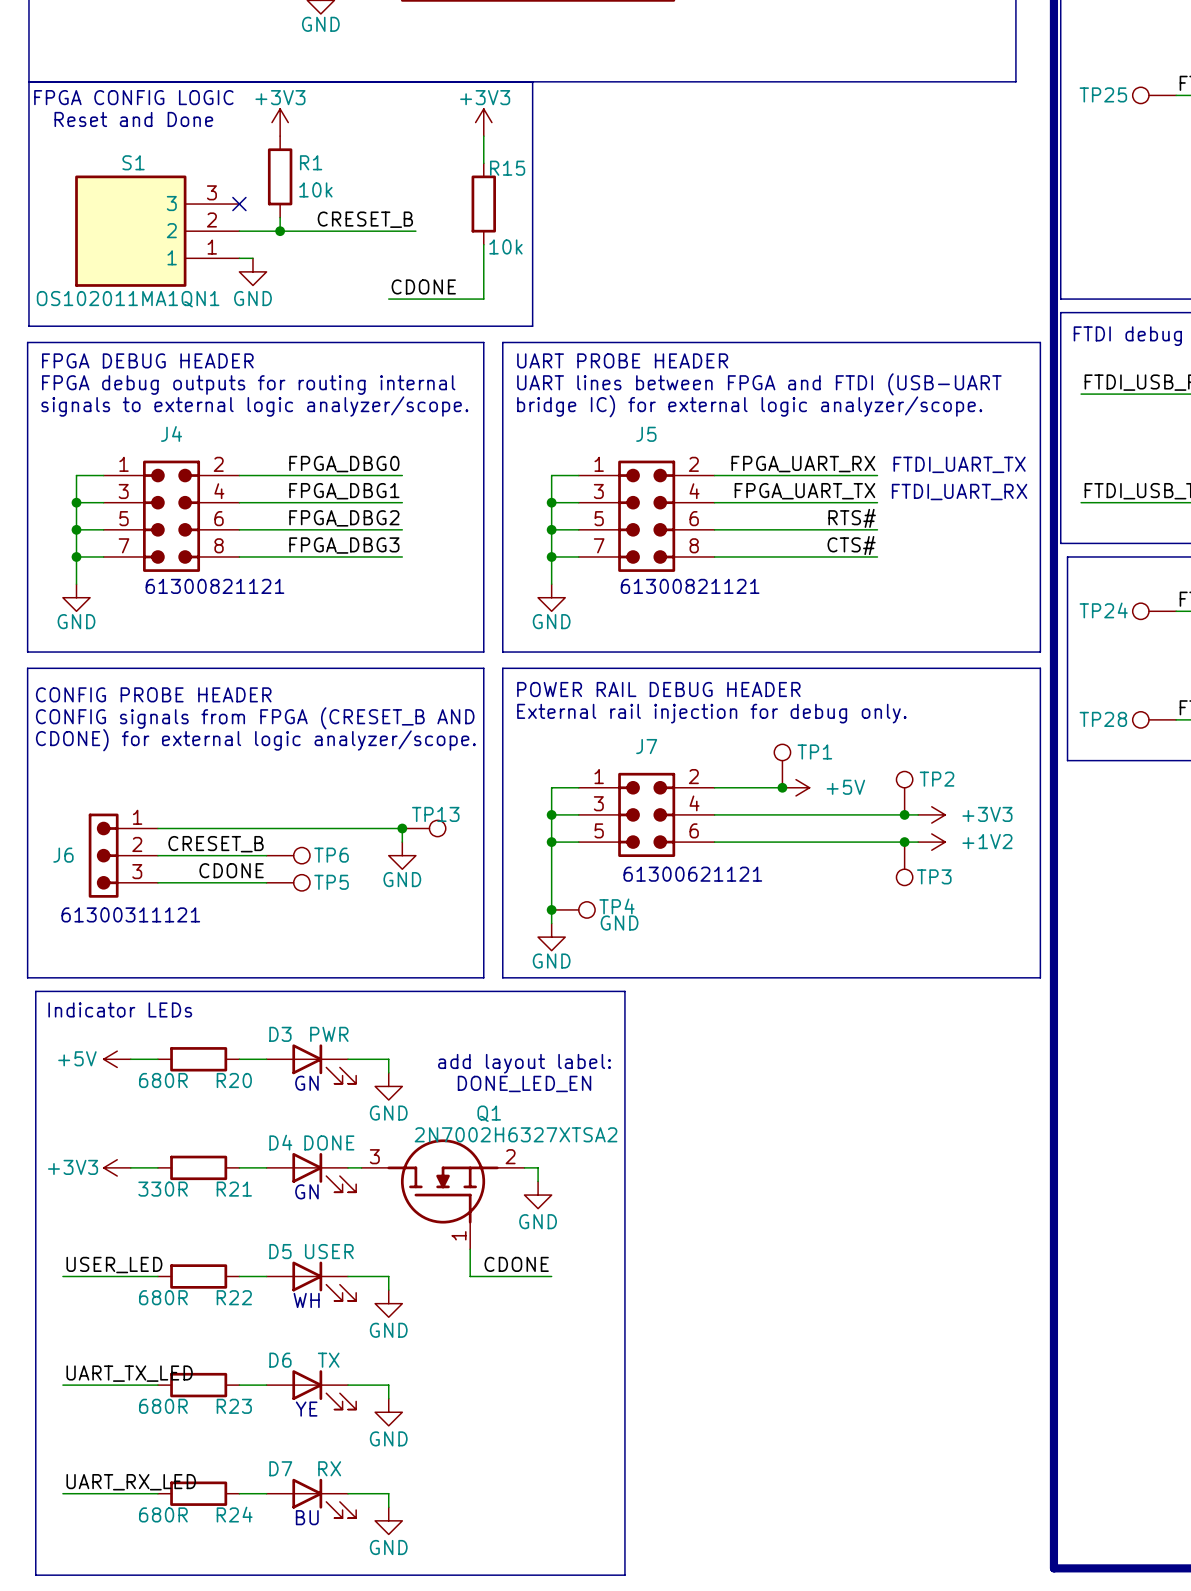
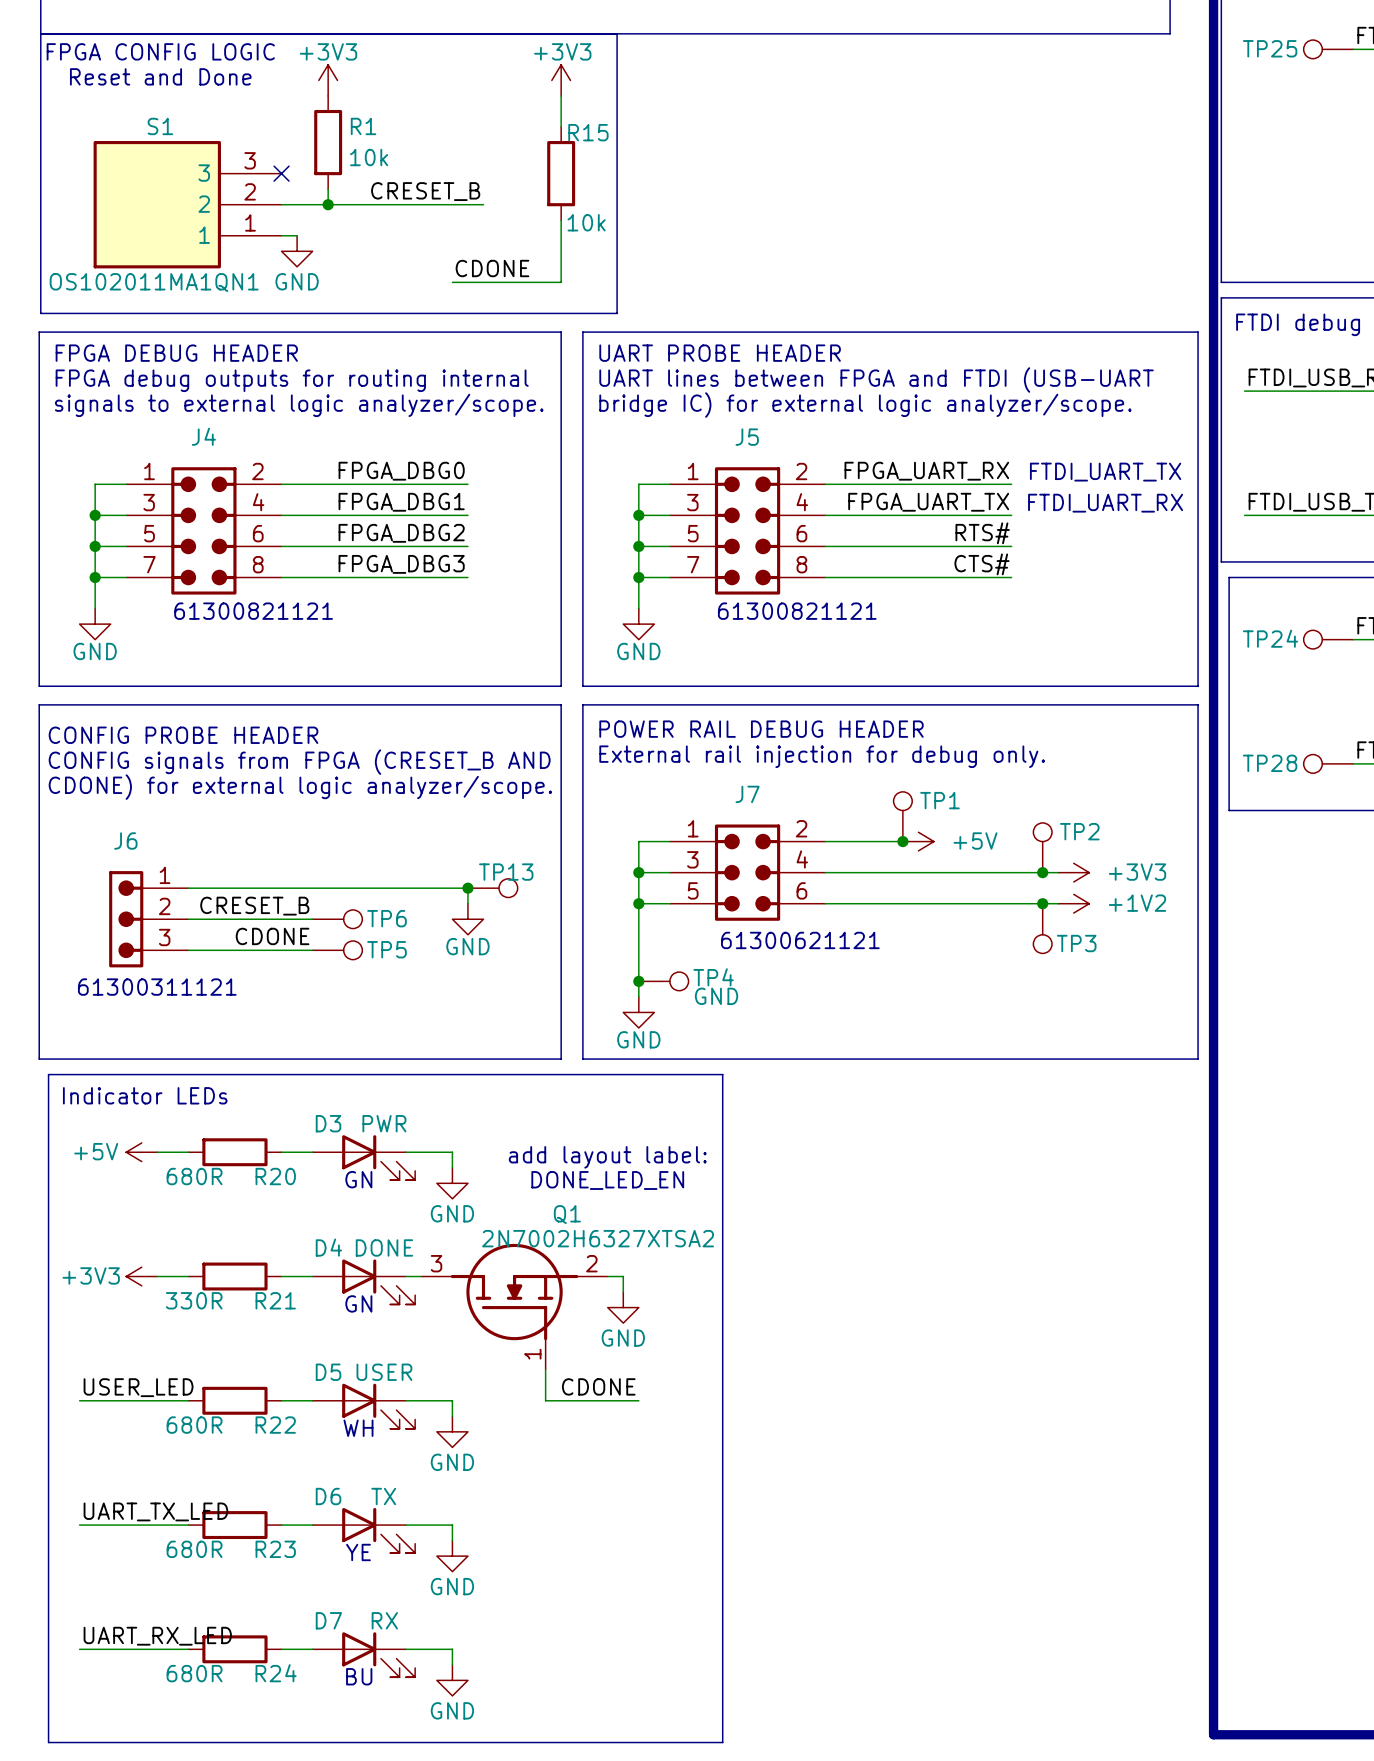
J6 name position: J6 (63, 855) -> J6 (125, 840)

